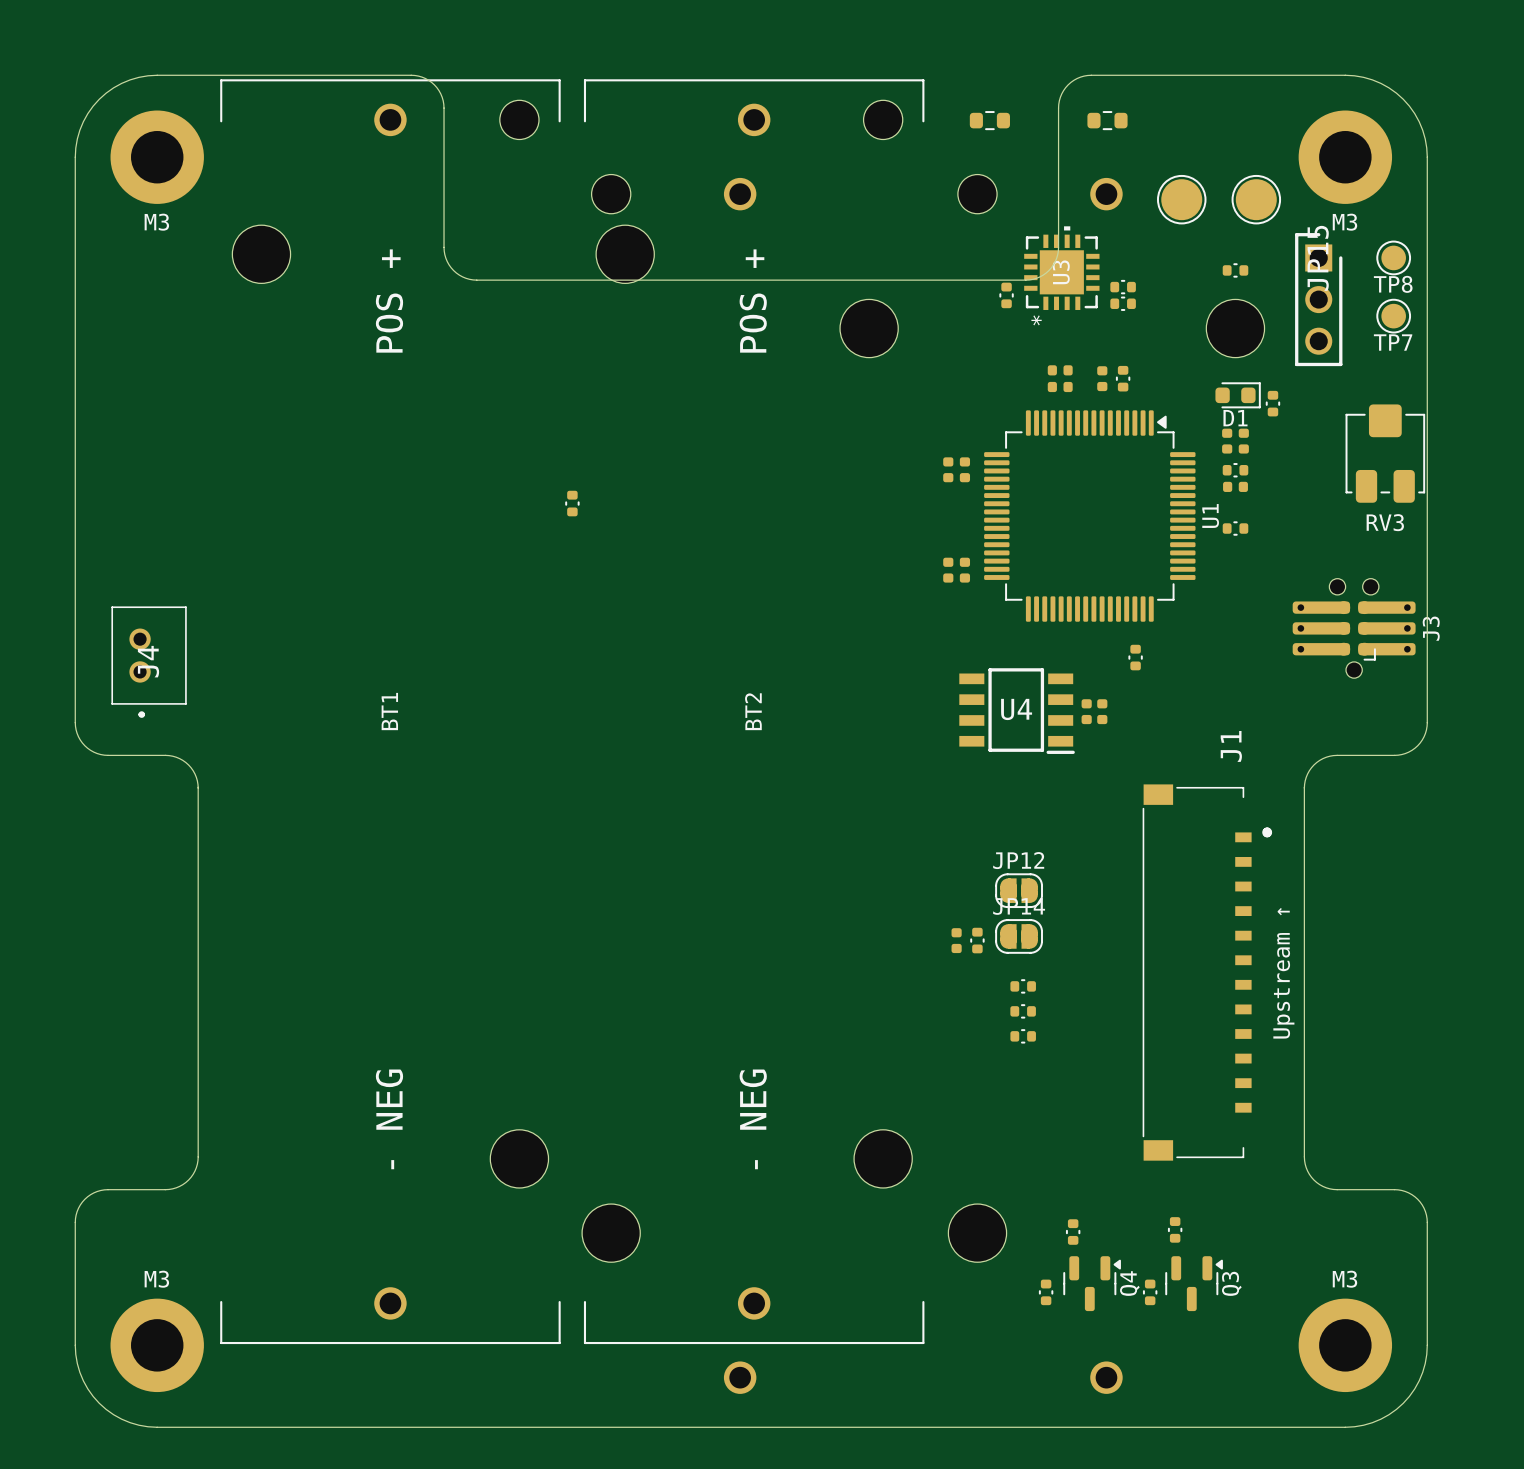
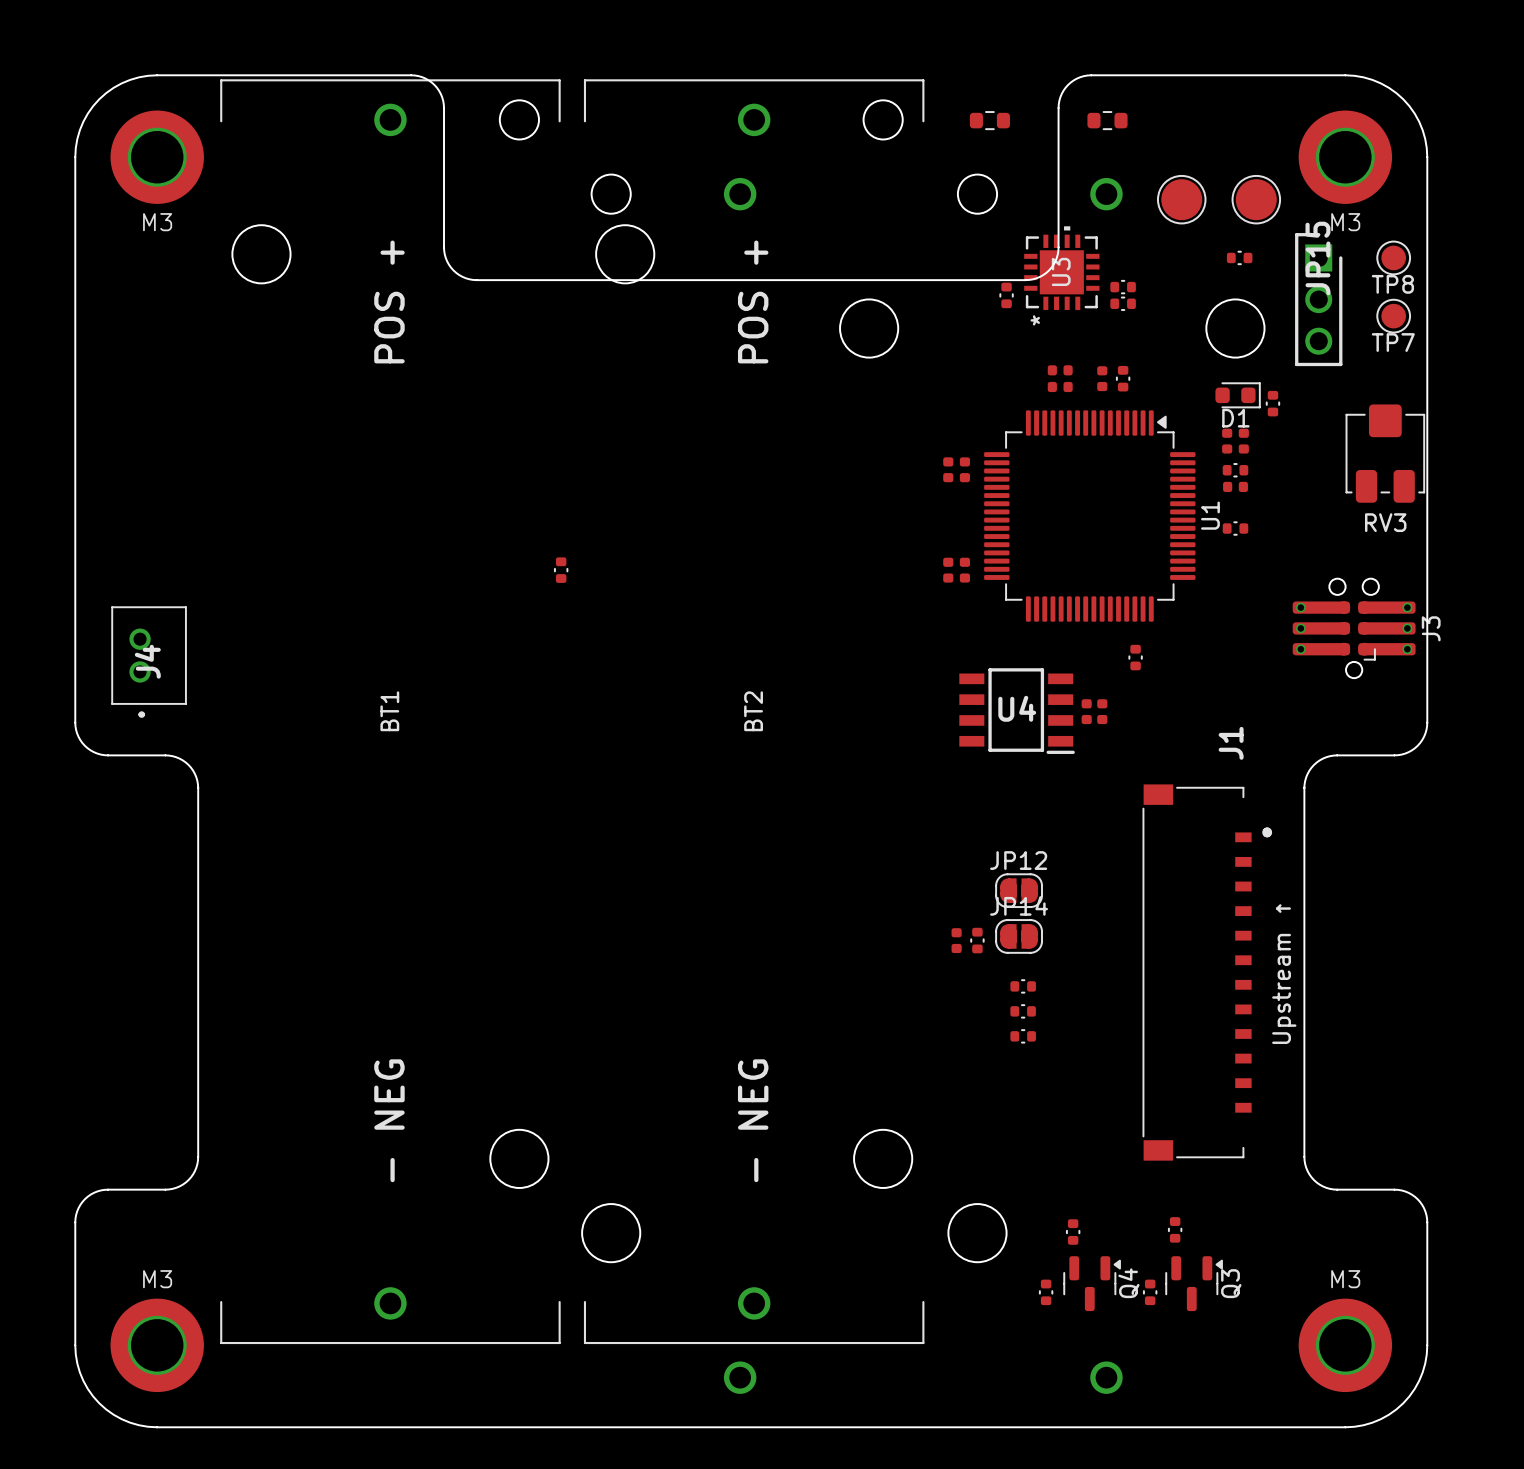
part position: (1235, 270) -> (1239, 257)
part position: (572, 503) -> (561, 570)

